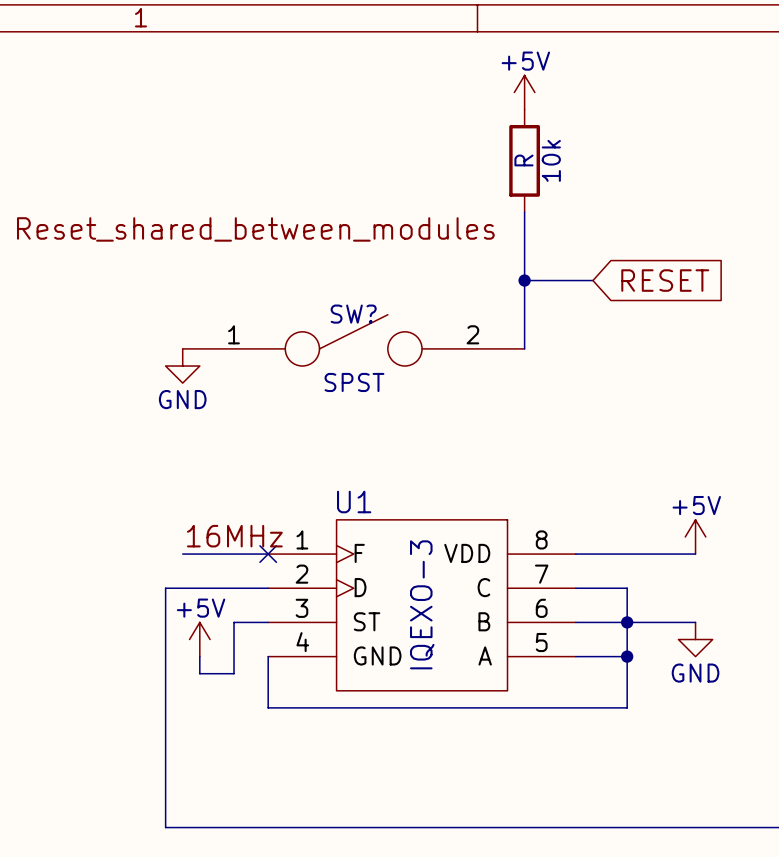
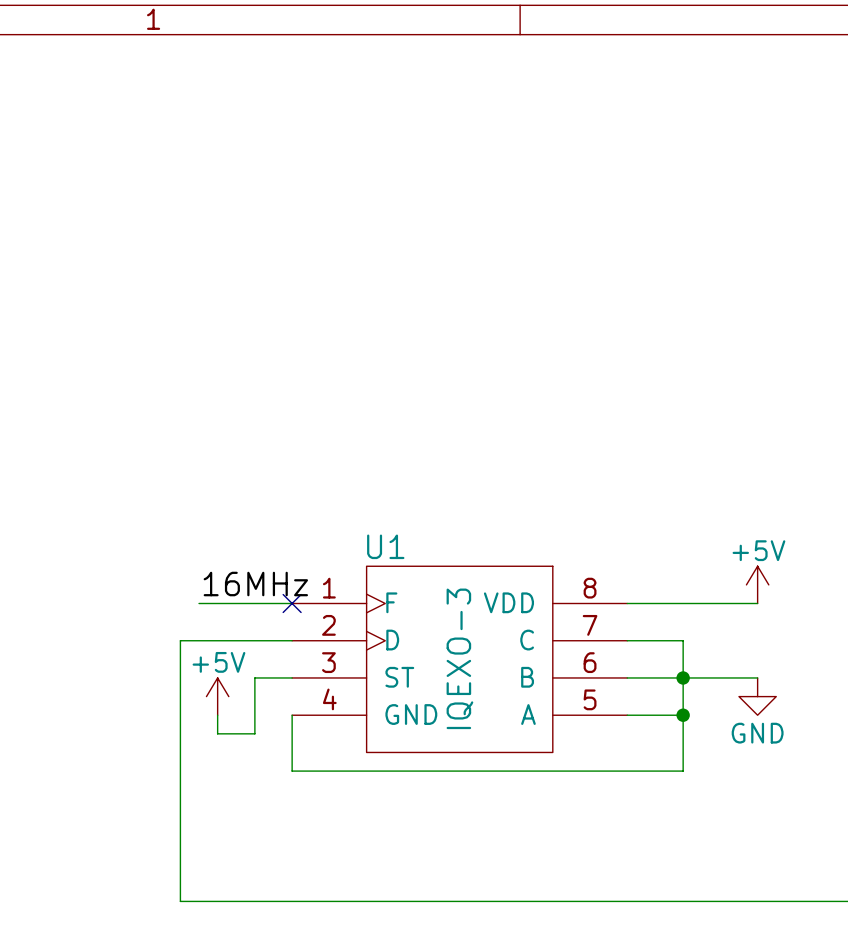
power symbol: +5V (524, 92) -> none
10k: R (524, 160) -> none
wire: (524, 212) (524, 348) -> none
label: Reset_shared_between_modules (255, 229) -> none
wire: (524, 280) (592, 280) -> none
junction: (524, 280) -> none
global label: RESET (665, 280) -> none
SW?: SPST (353, 340) -> none
power symbol: GND (182, 366) -> none

